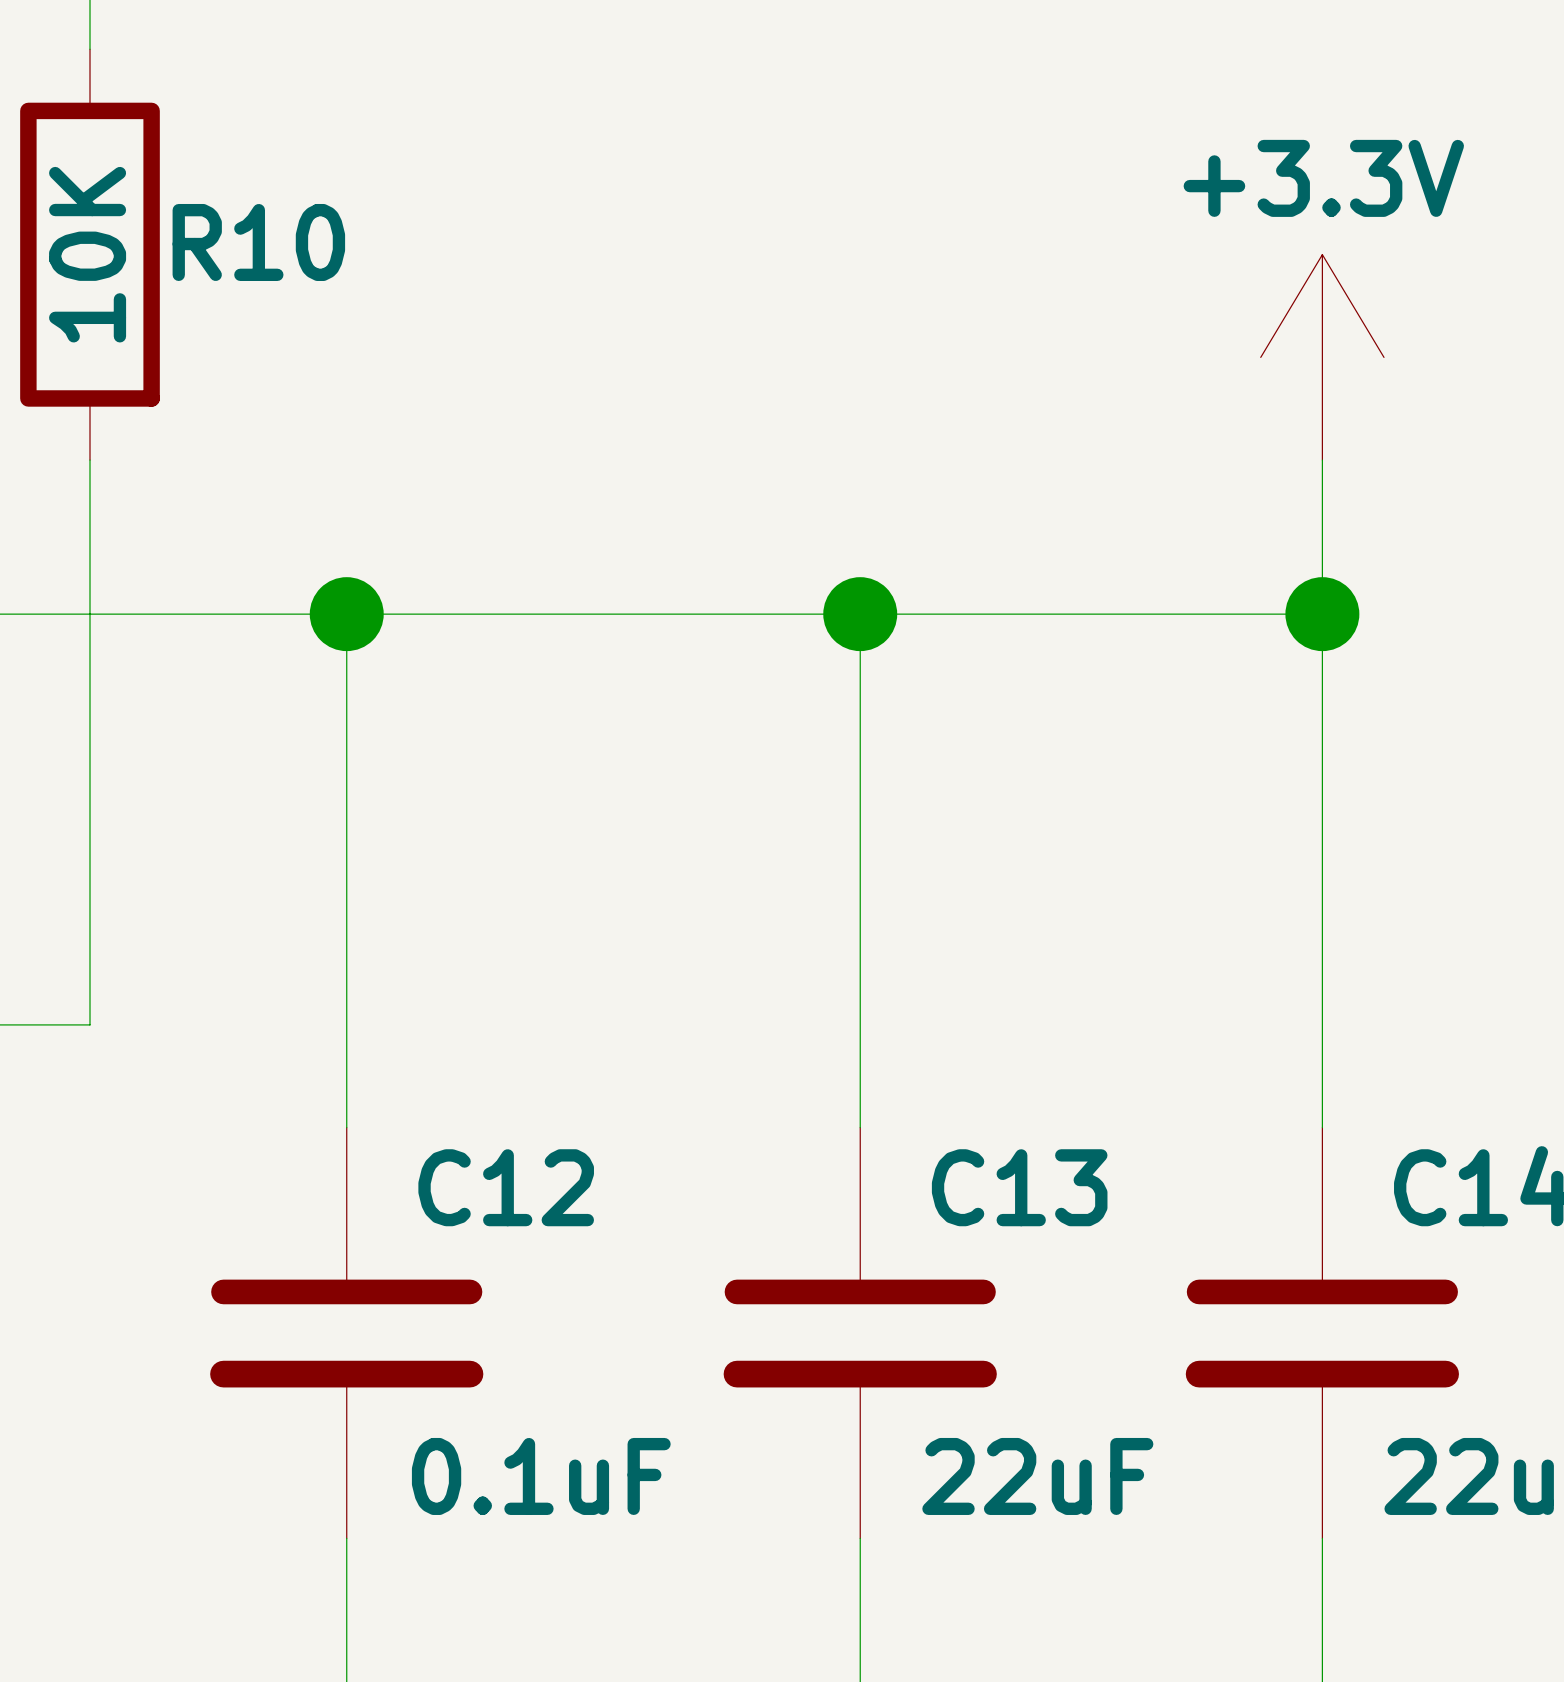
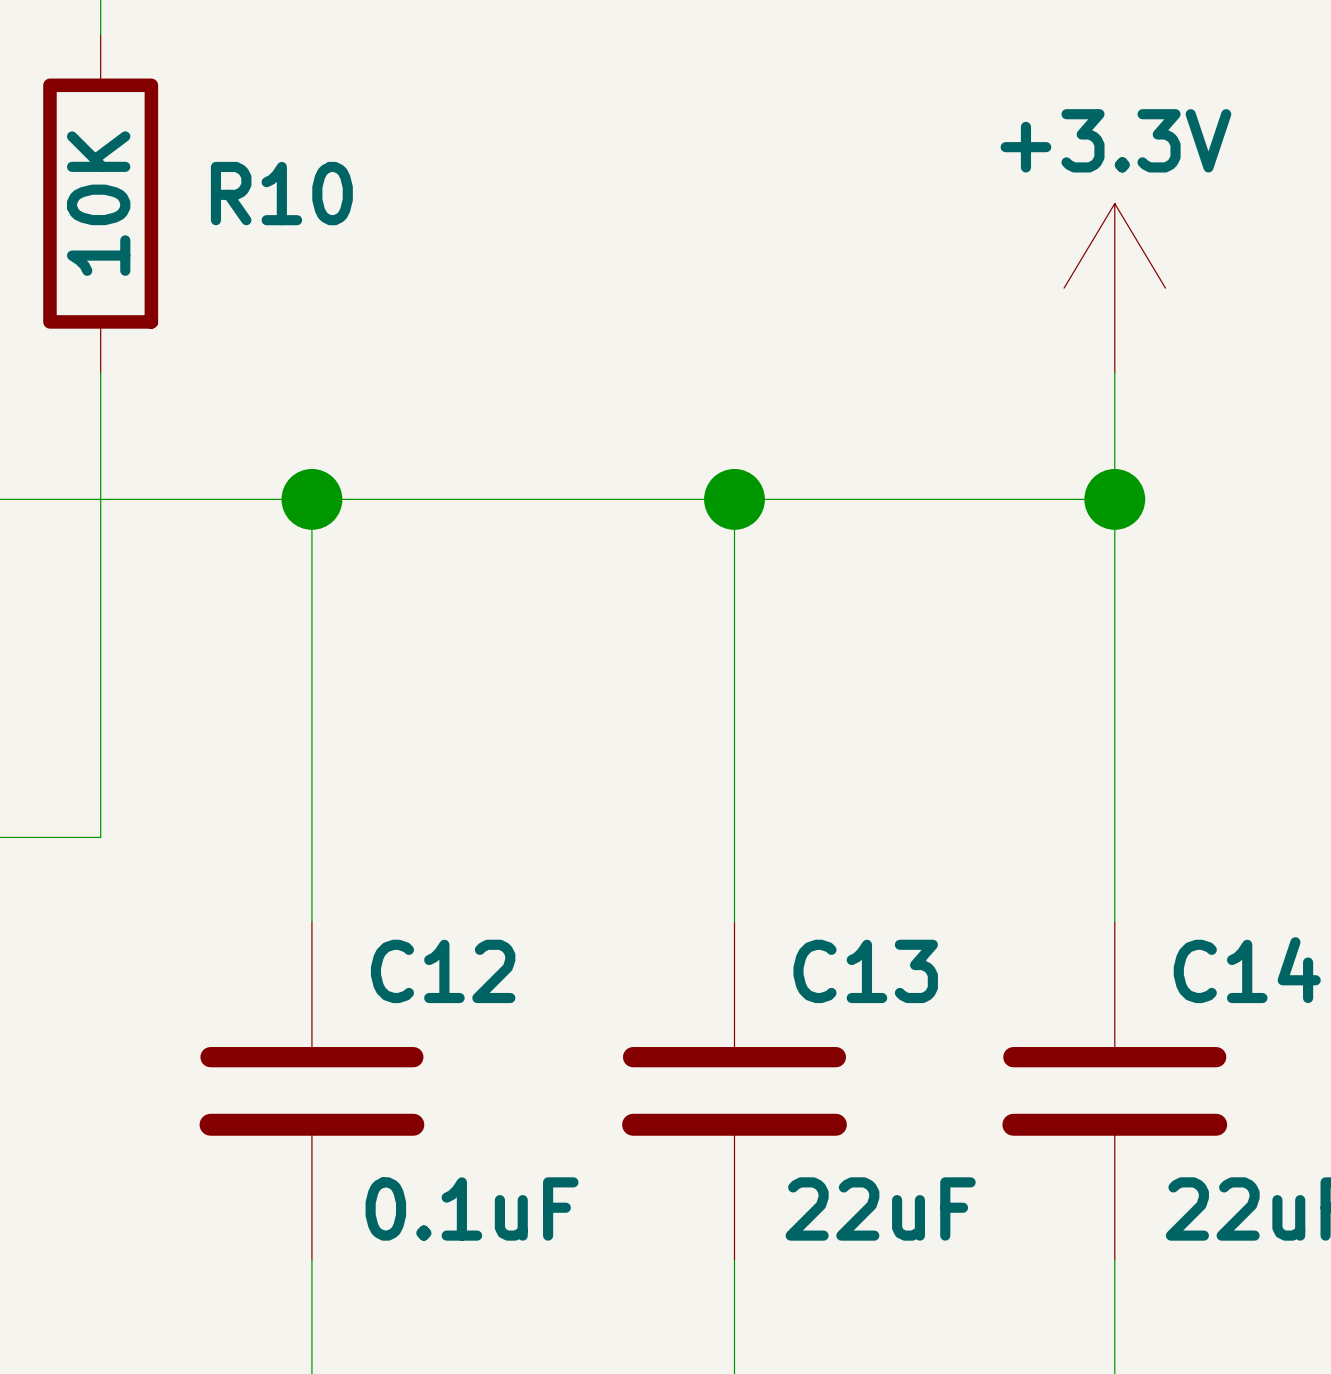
R10 name position: R10 (258, 242) -> R10 (281, 193)

